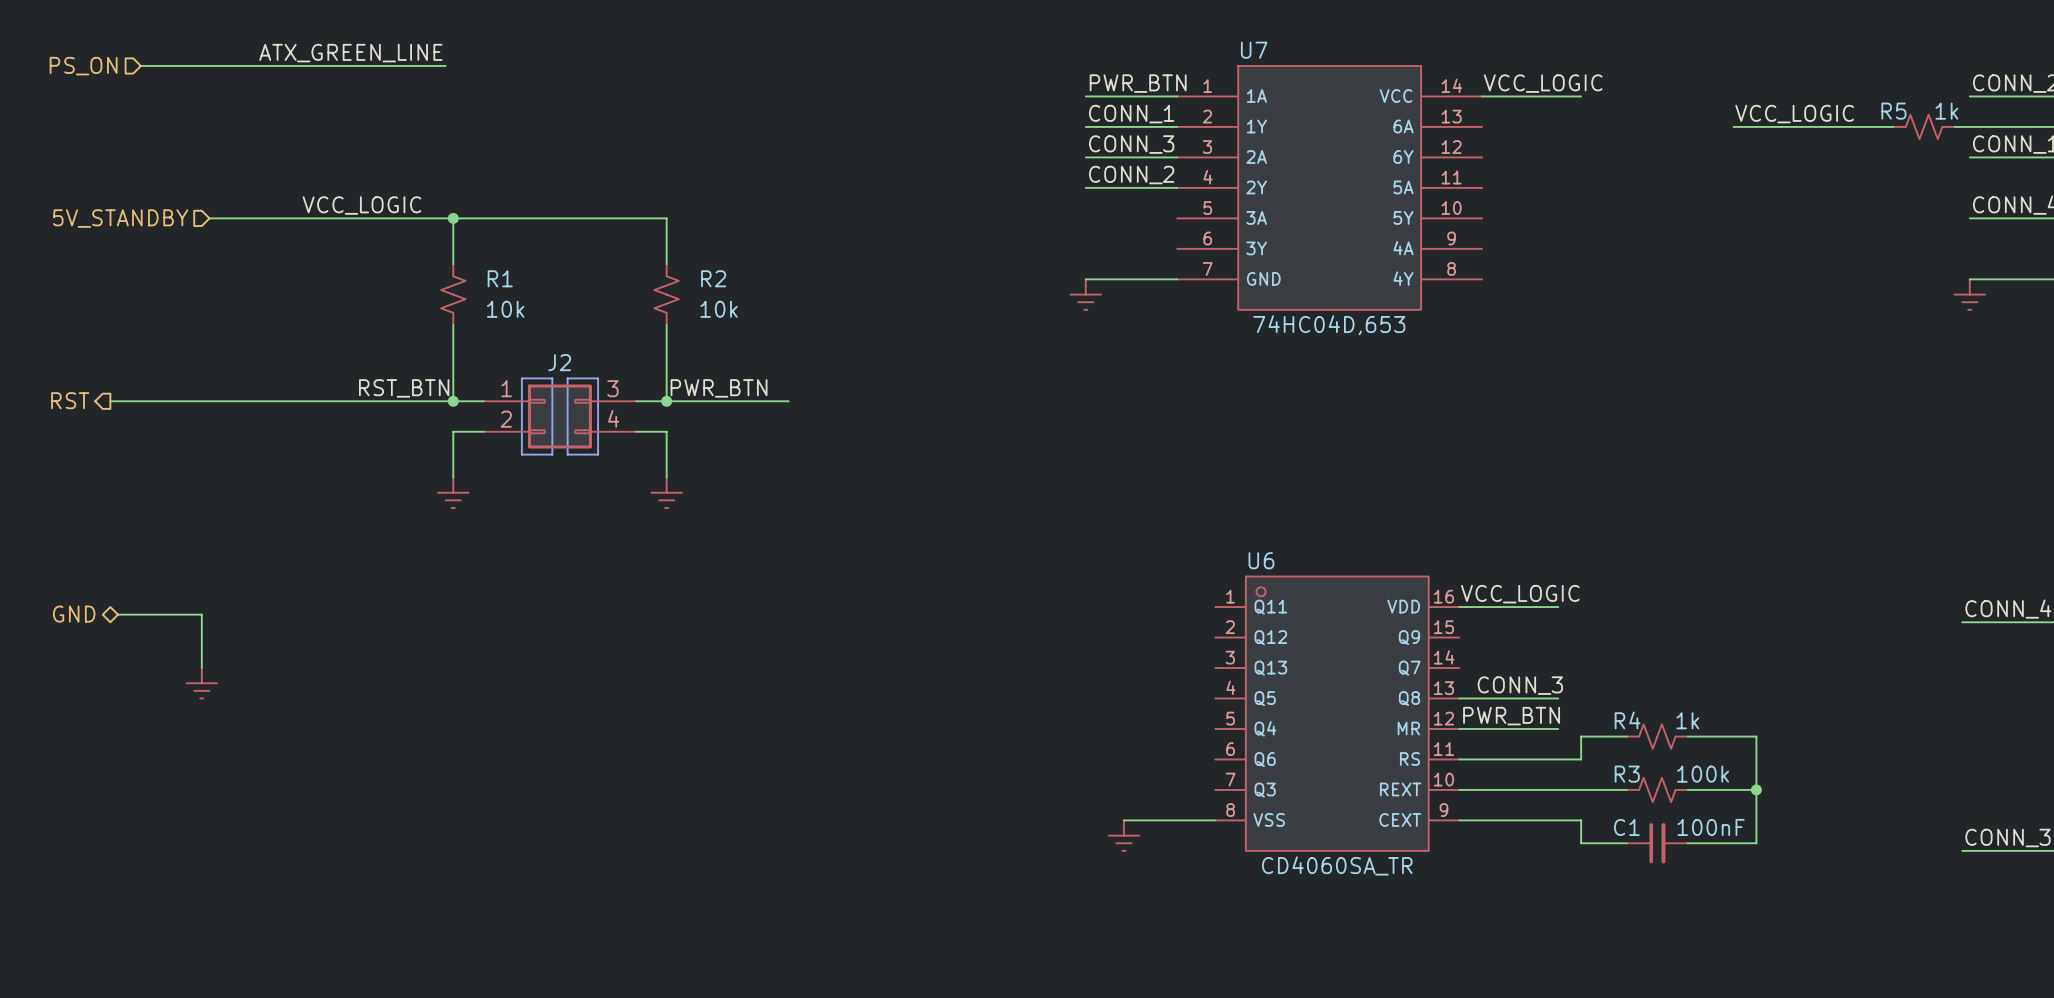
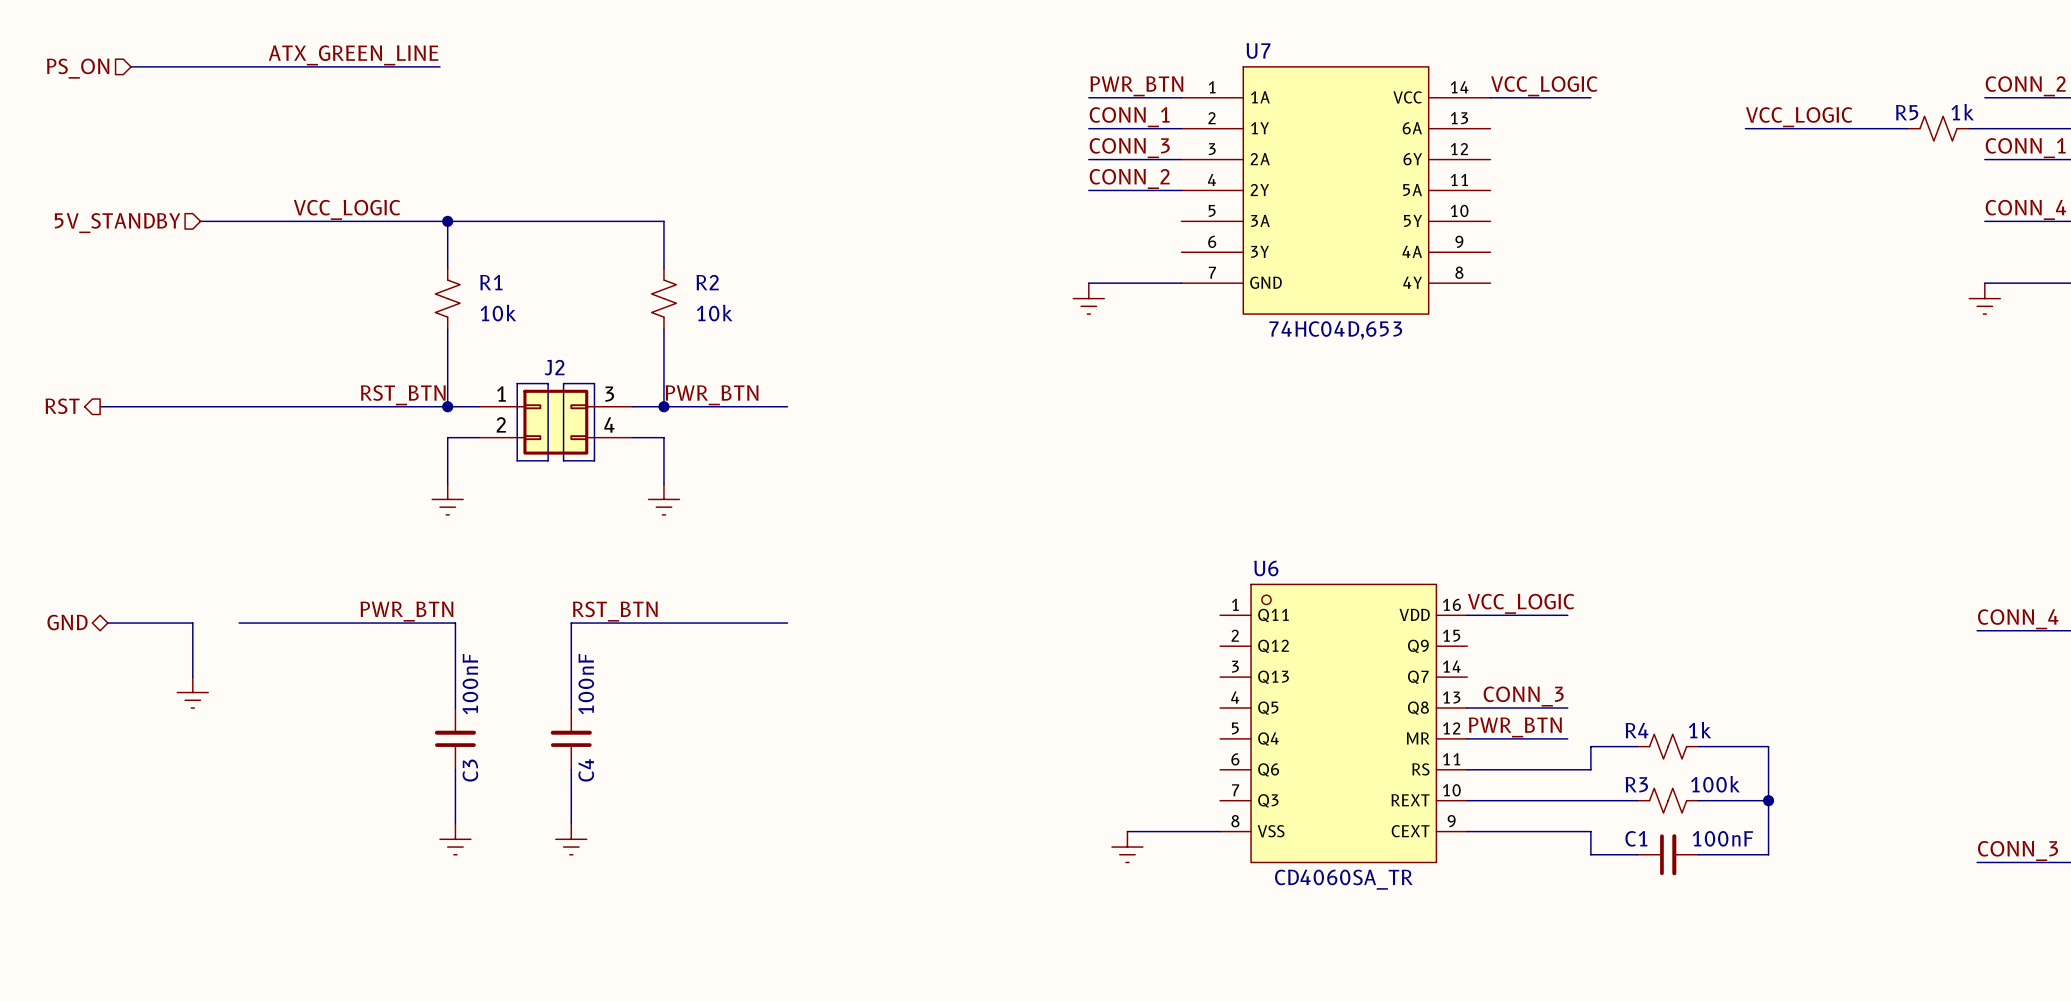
label: none -> PWR_BTN (406, 611)
label: none -> RST_BTN (615, 611)
wire: none -> (239, 623) (455, 623) (455, 707)
wire: none -> (787, 623) (571, 623) (571, 707)
C3: none -> 100nF (455, 738)
C4: none -> 100nF (571, 738)
wire: none -> (455, 769) (455, 823)
wire: none -> (571, 769) (571, 823)
power symbol: none -> (455, 839)
power symbol: none -> (571, 839)

